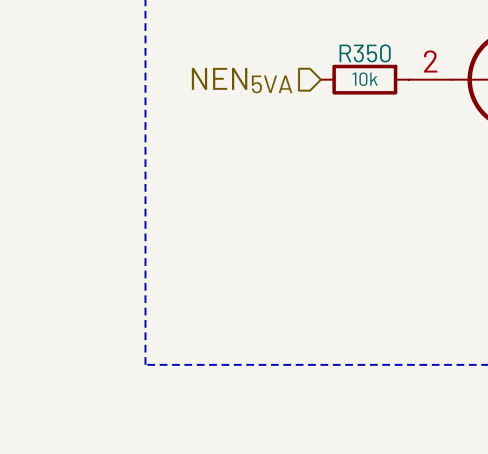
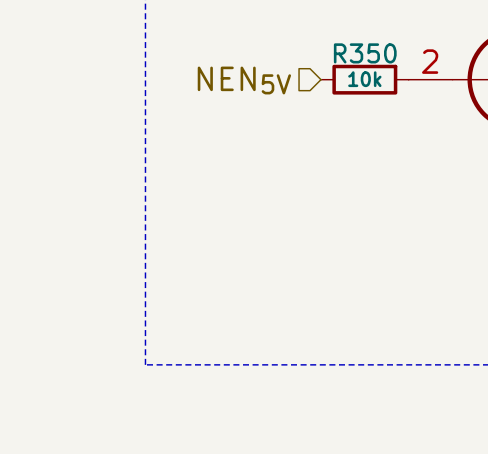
hierarchical label: NEN5VA (242, 80) -> NEN5V (244, 80)

